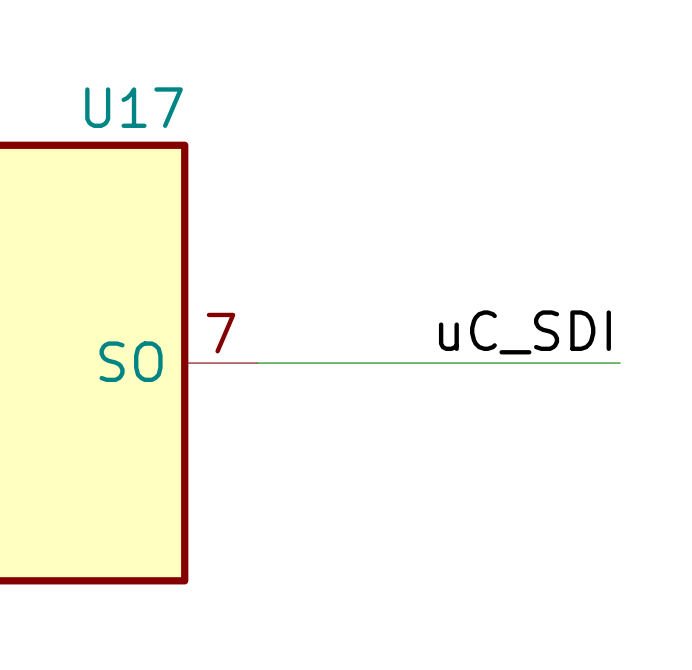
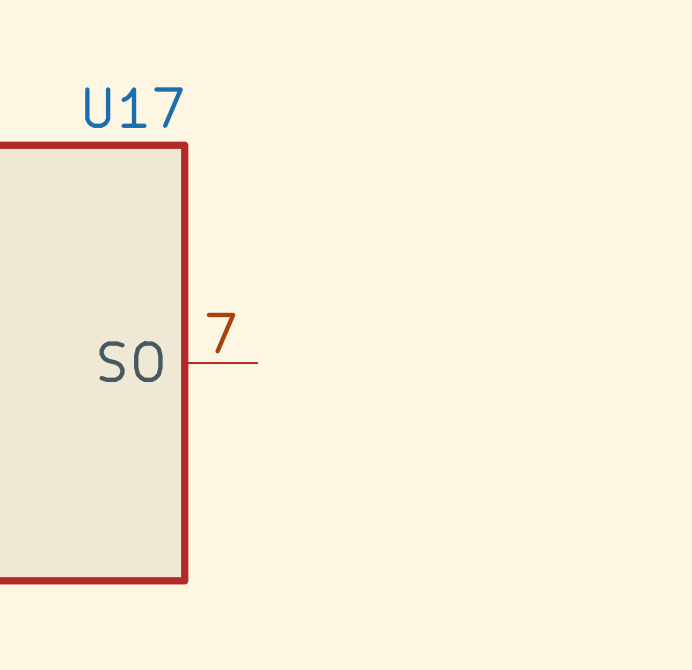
label: uC_SDI (524, 332) -> none
wire: (257, 363) (620, 363) -> none

